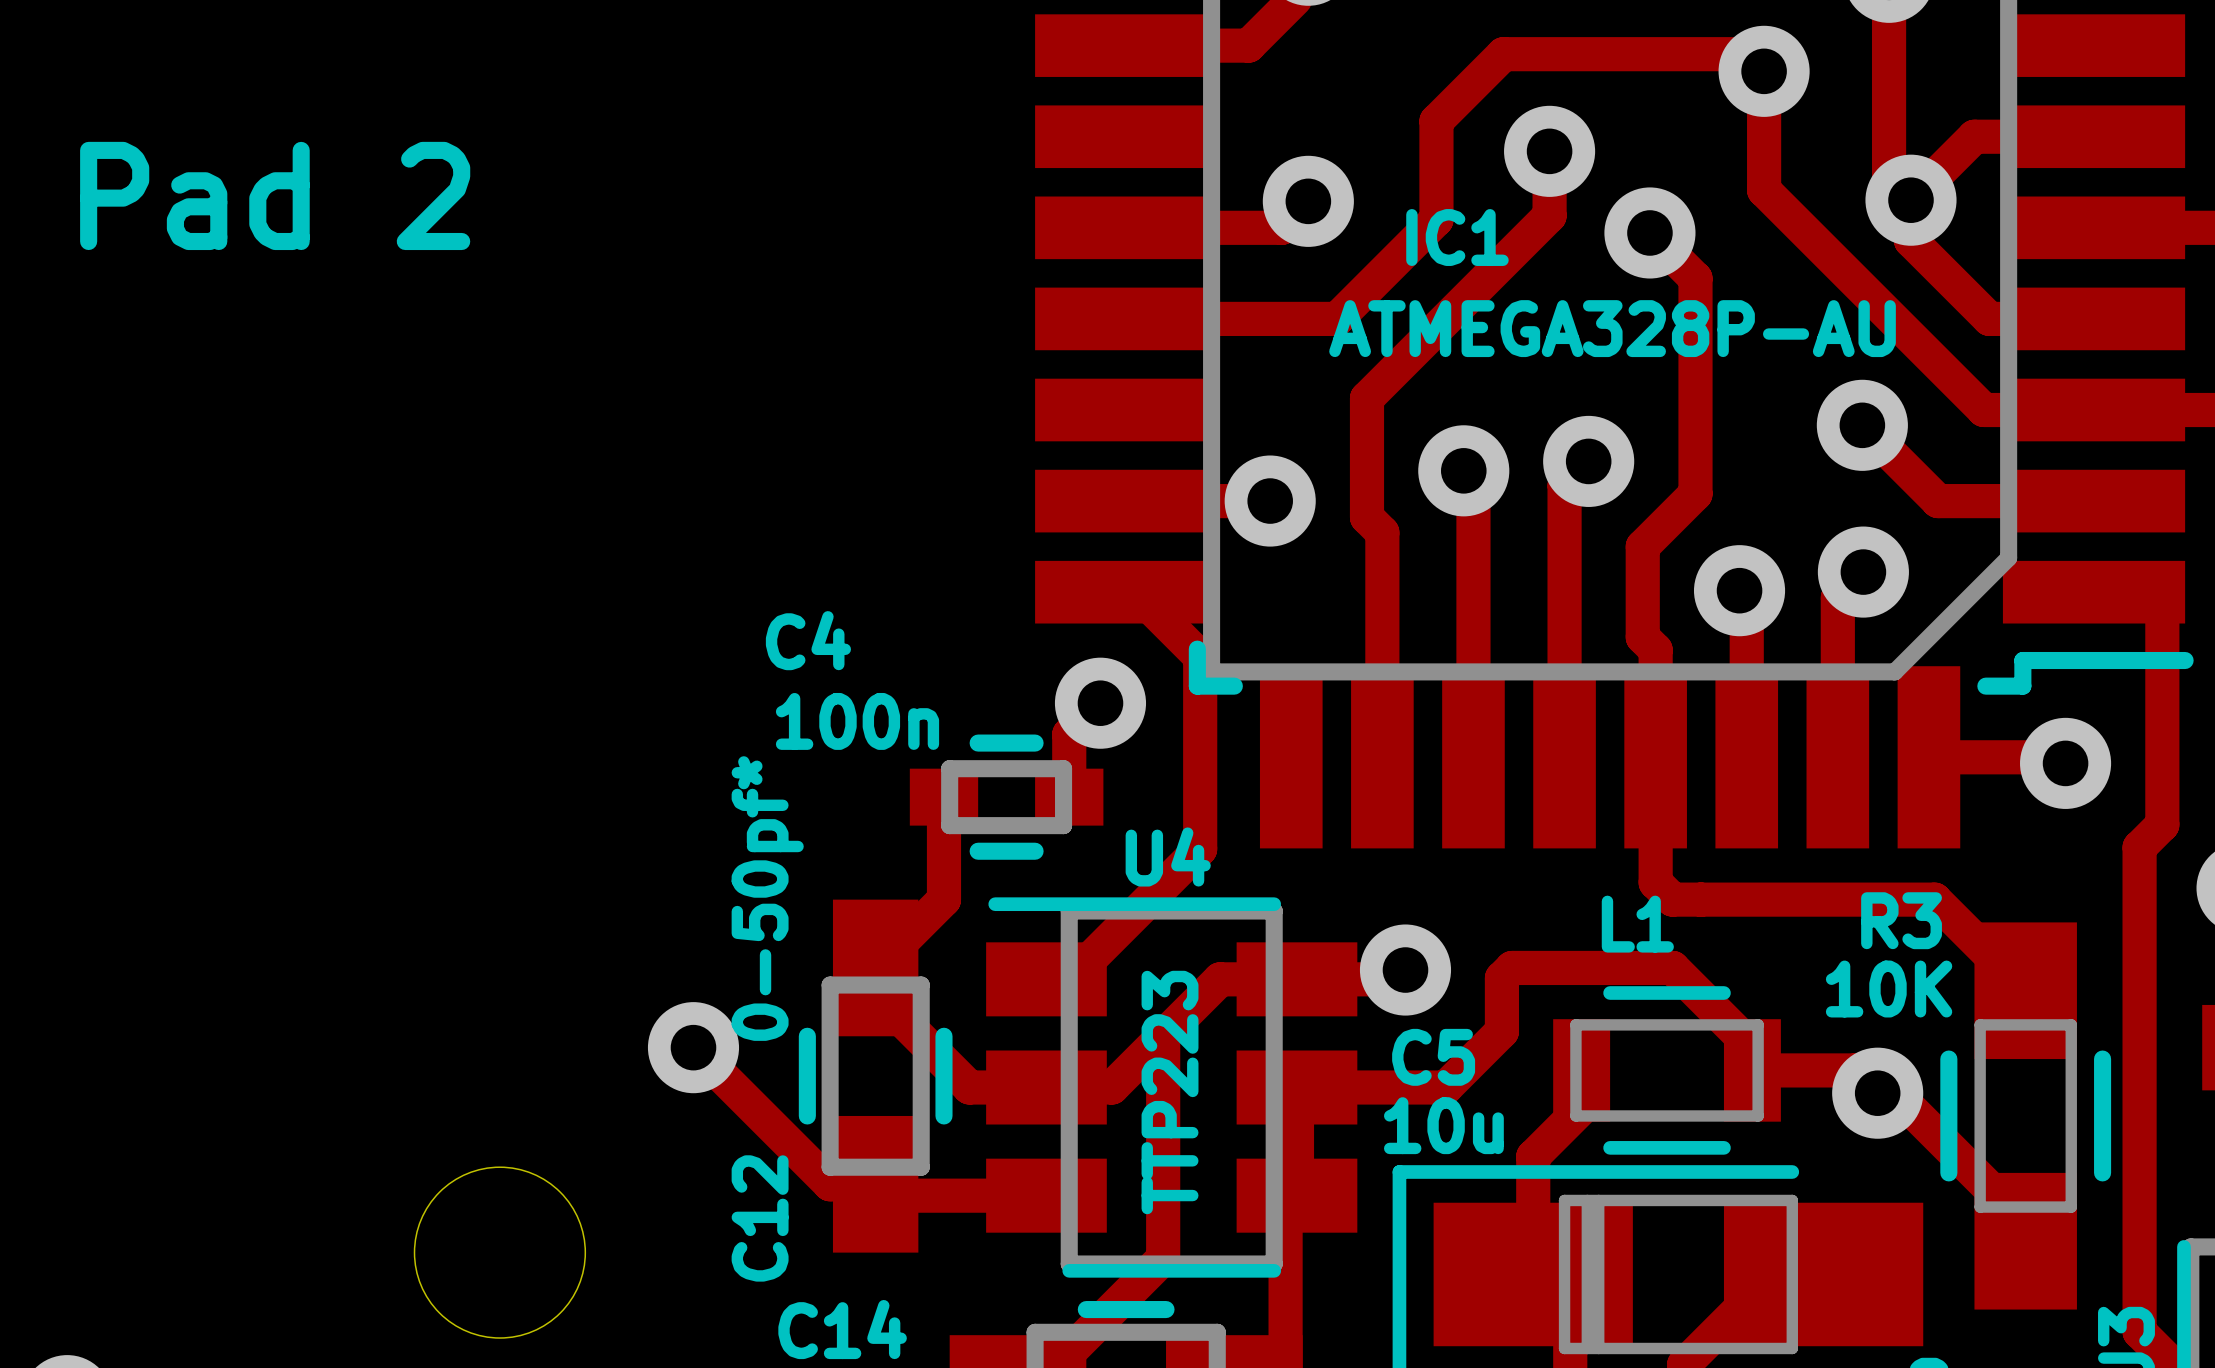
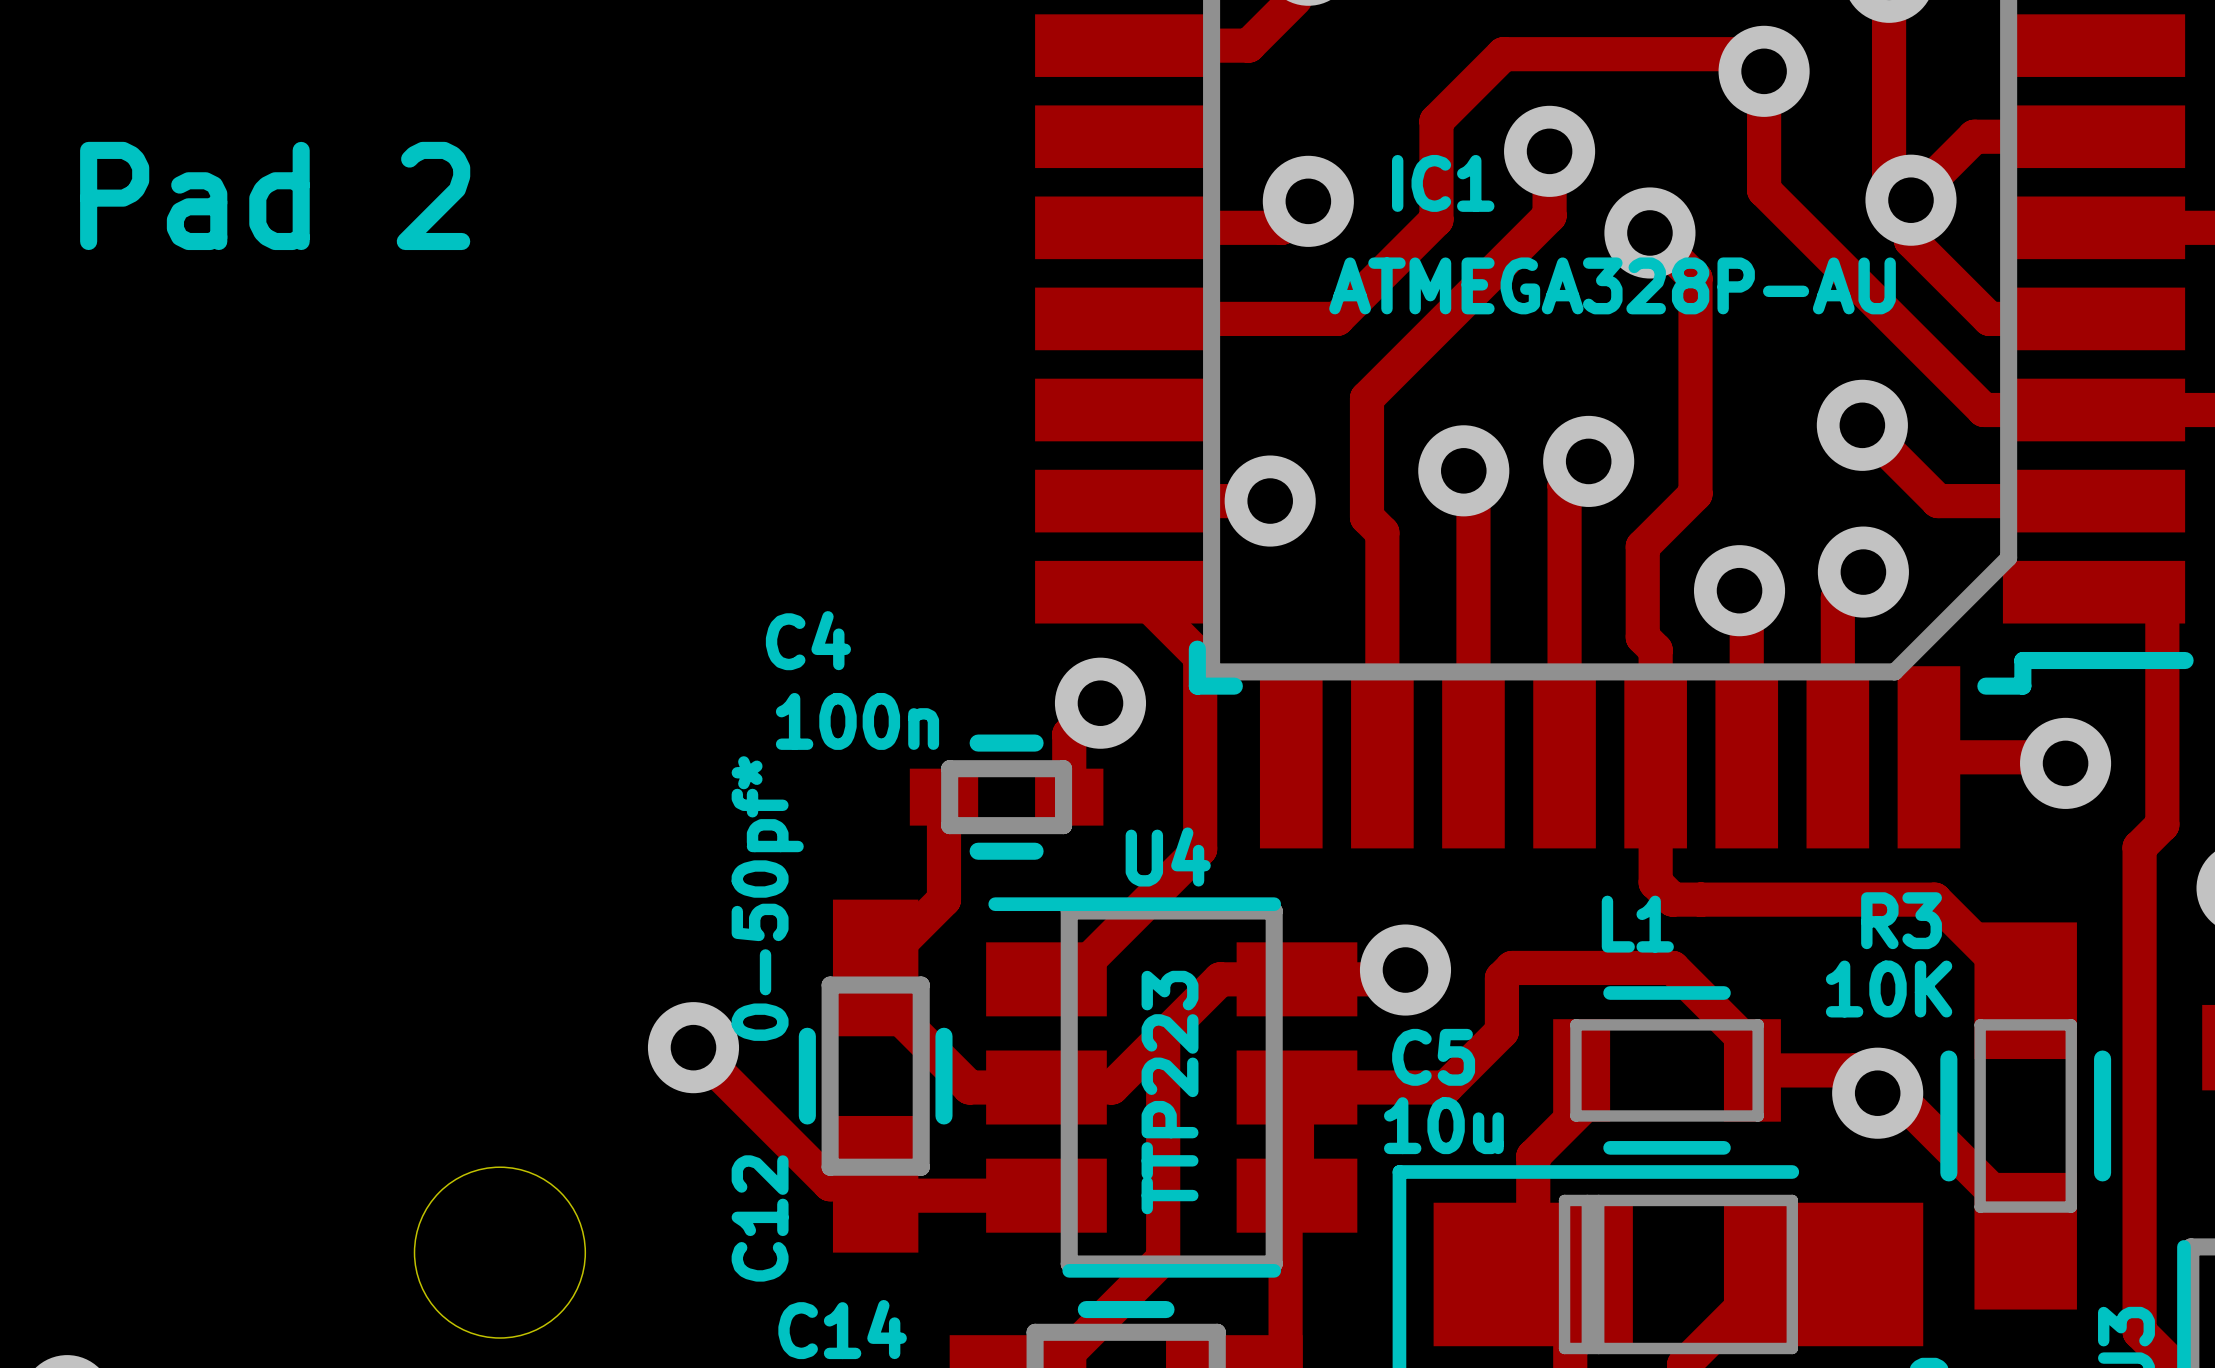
IC1 name position: IC1 (1457, 237) -> IC1 (1443, 183)
IC1 value position: ATMEGA328P-AU (1612, 328) -> ATMEGA328P-AU (1612, 285)

